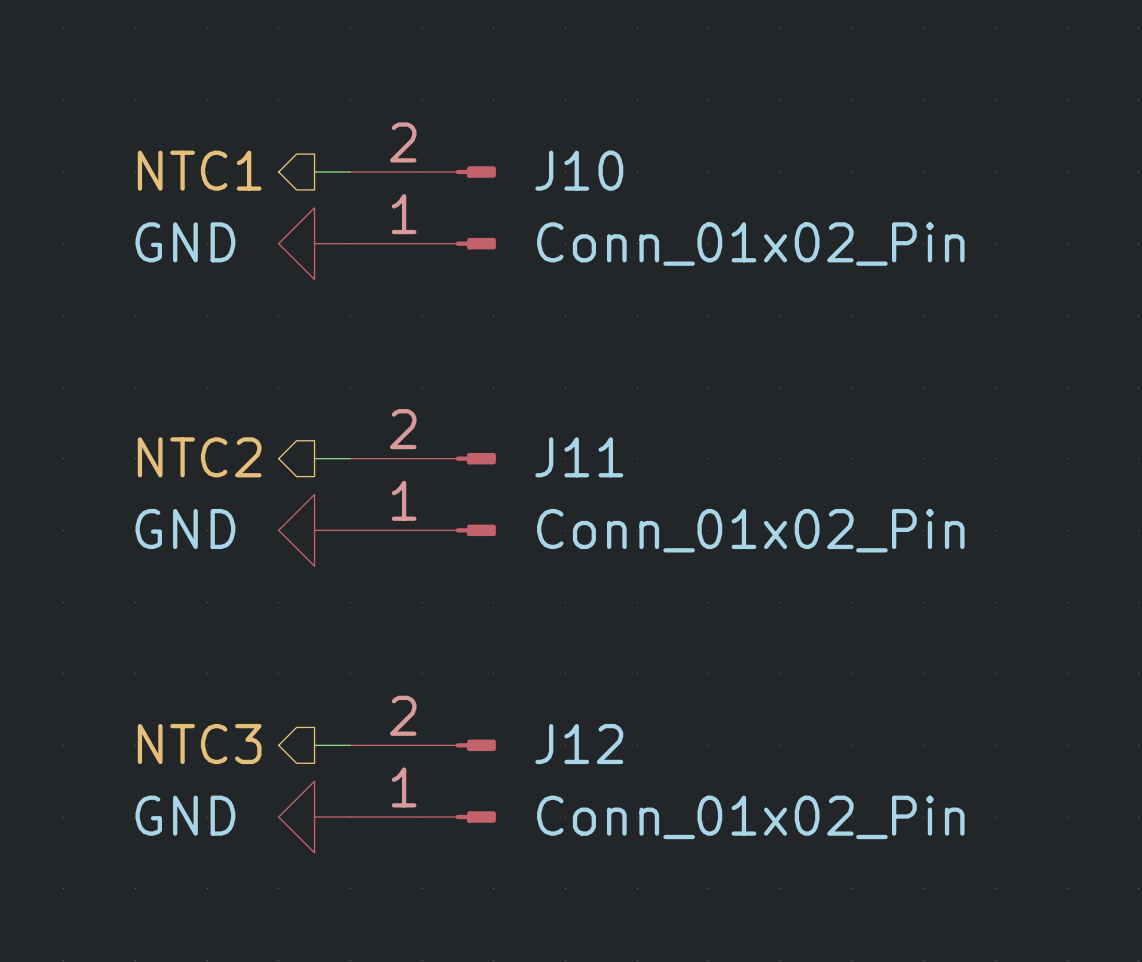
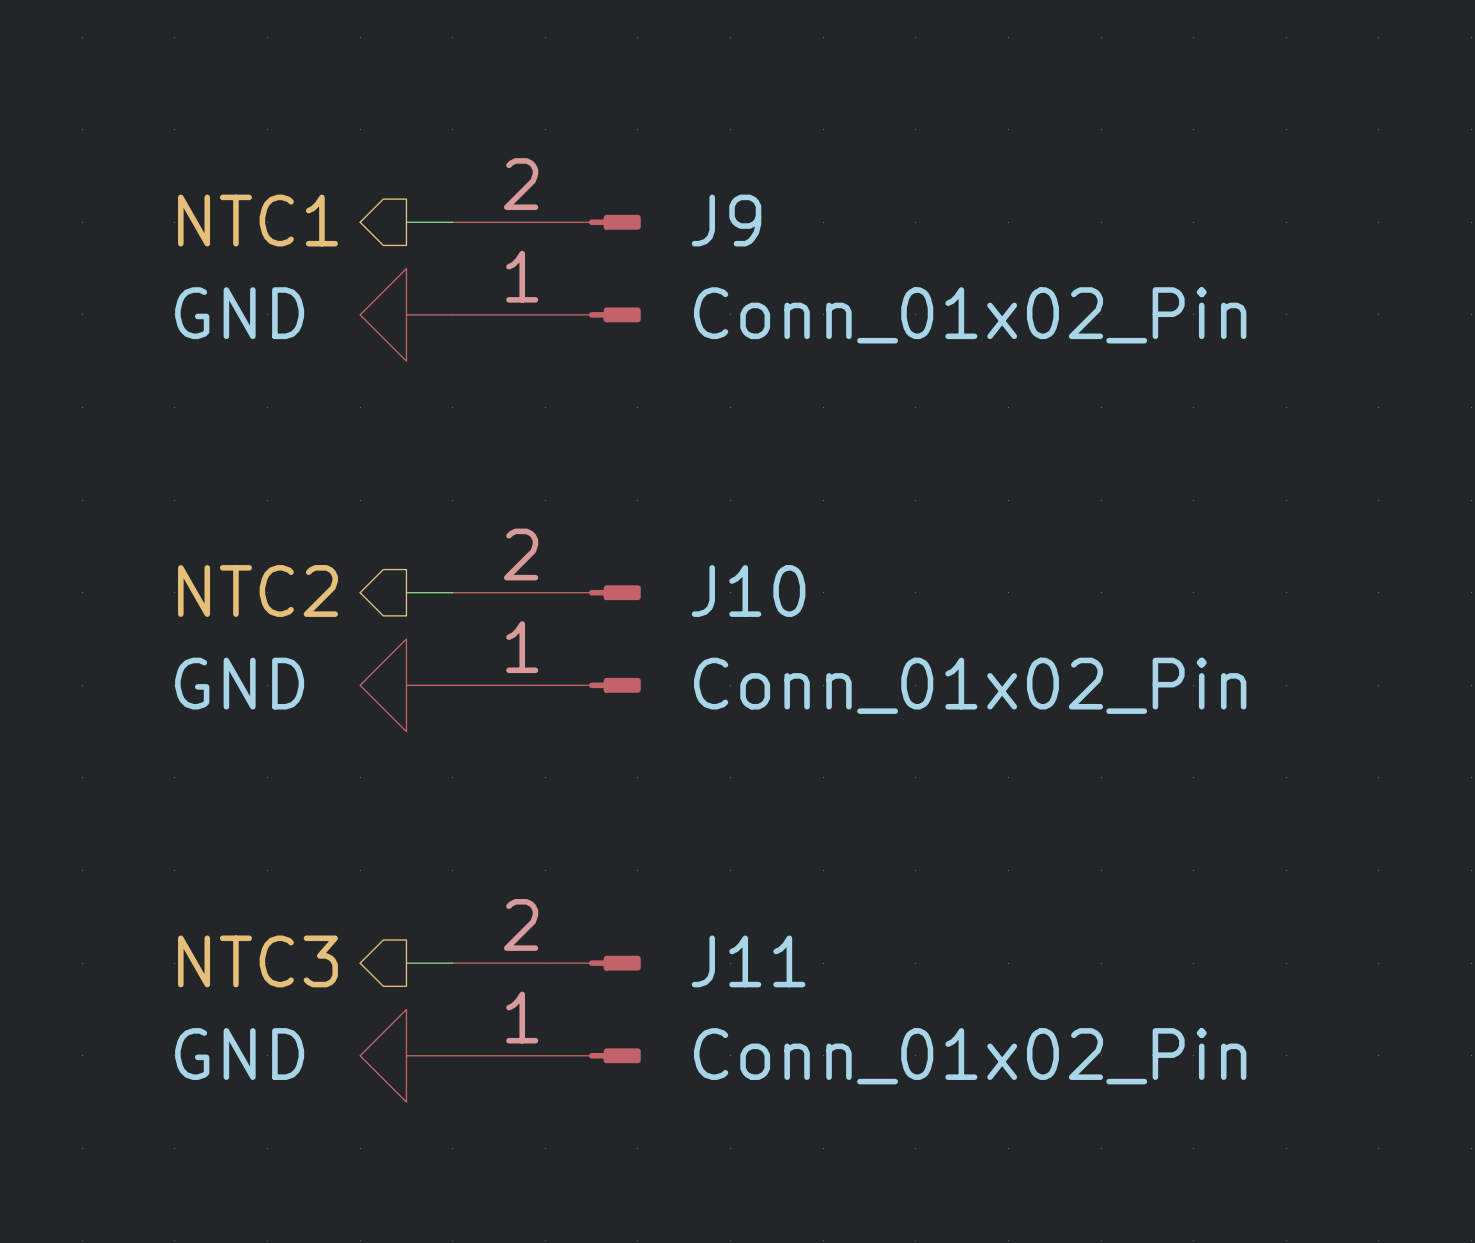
J10 name: J10 (579, 170) -> J9 (726, 220)
J11 name: J11 (579, 457) -> J10 (748, 590)
J12 name: J12 (579, 744) -> J11 (748, 961)

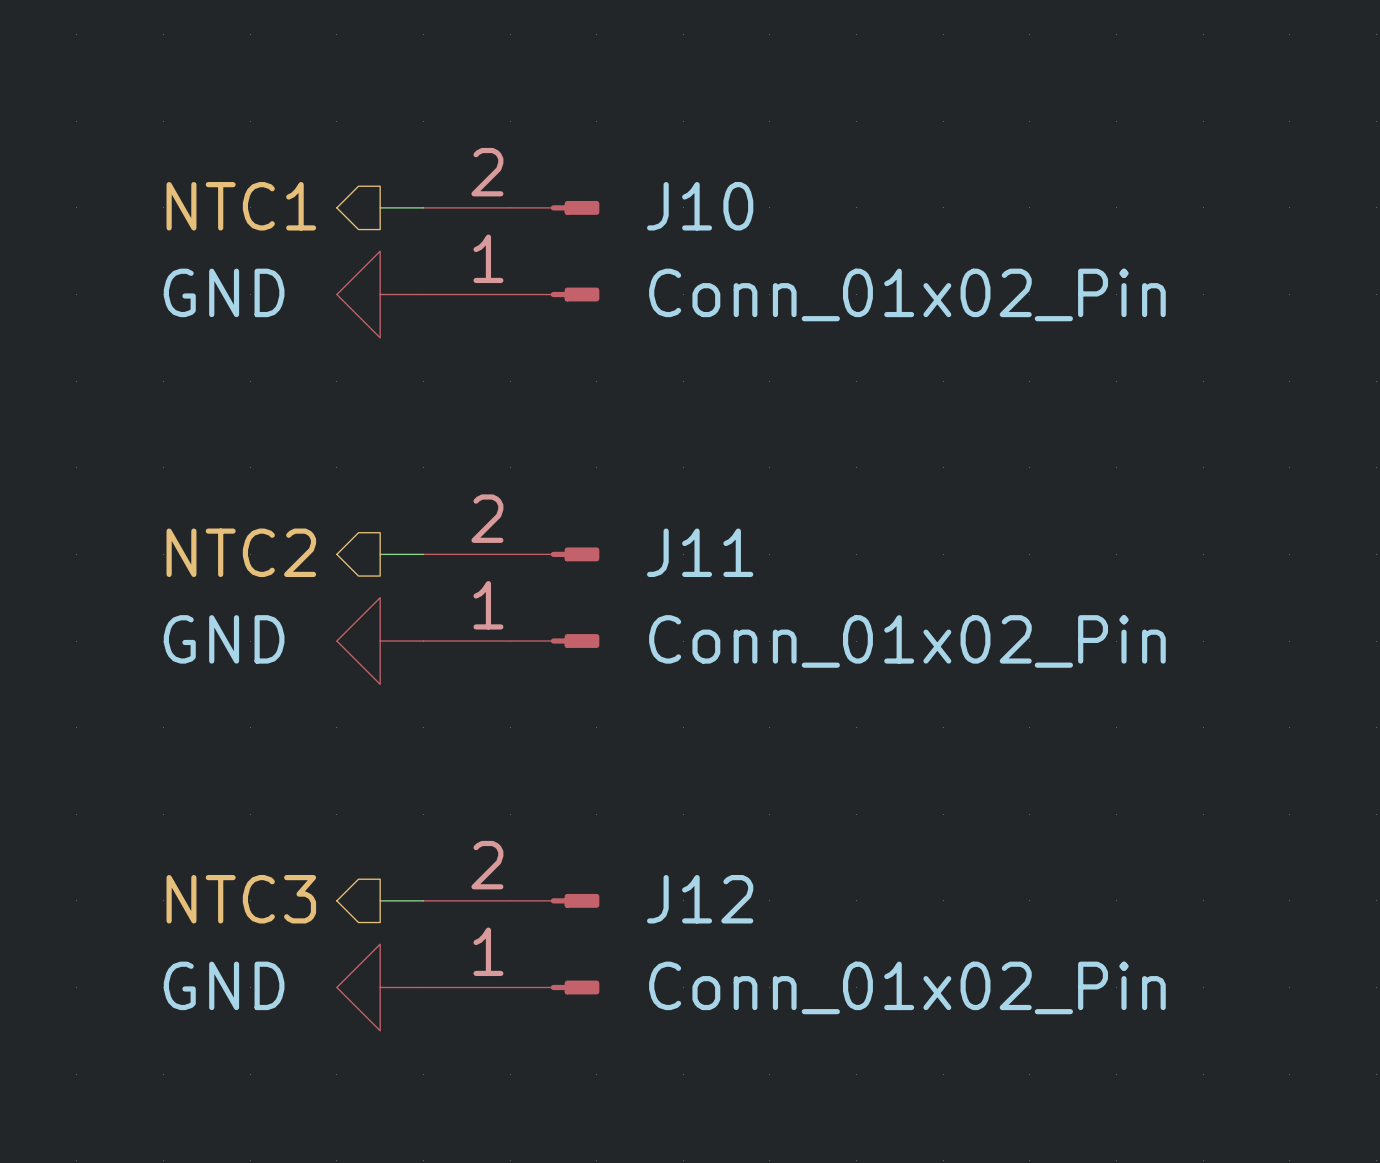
J9 name: J9 (726, 220) -> J10 (700, 206)
J10 name: J10 (748, 590) -> J11 (700, 552)
J11 name: J11 (748, 961) -> J12 (700, 899)

